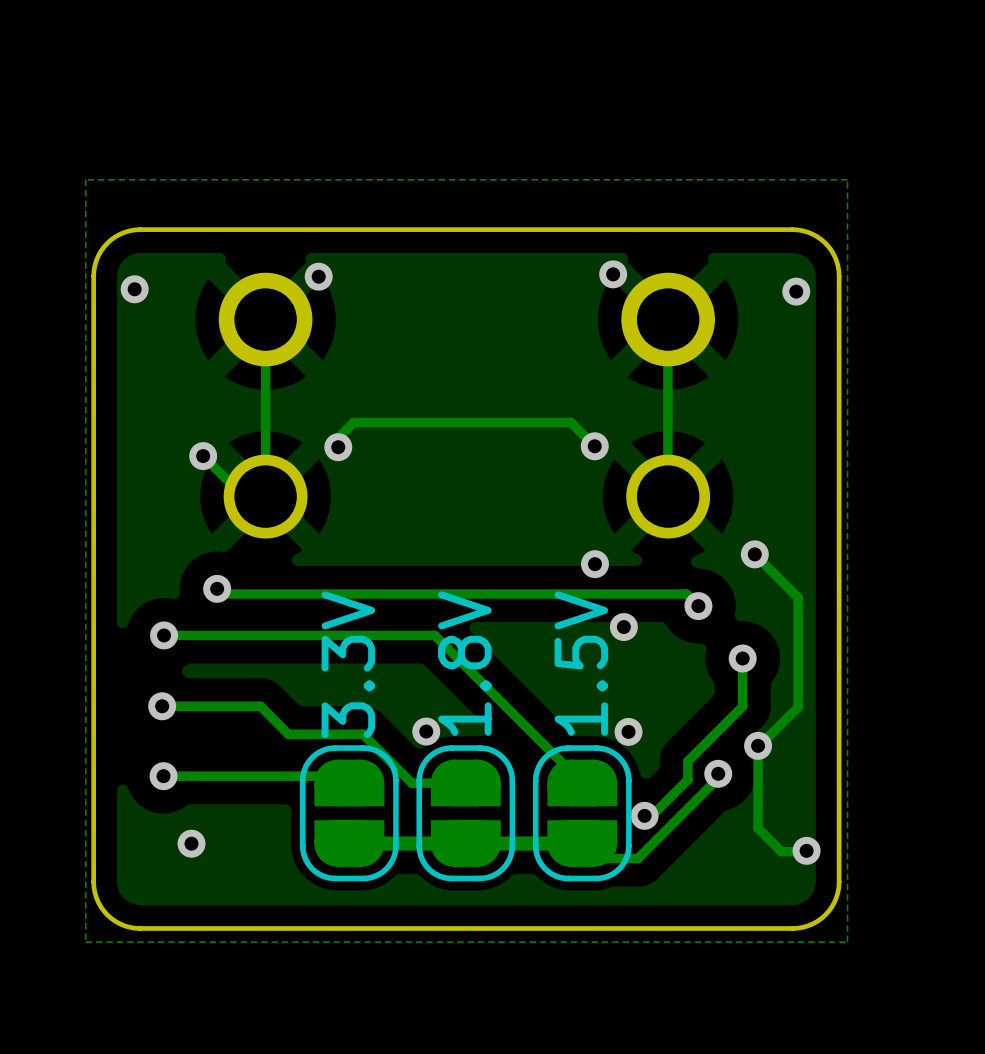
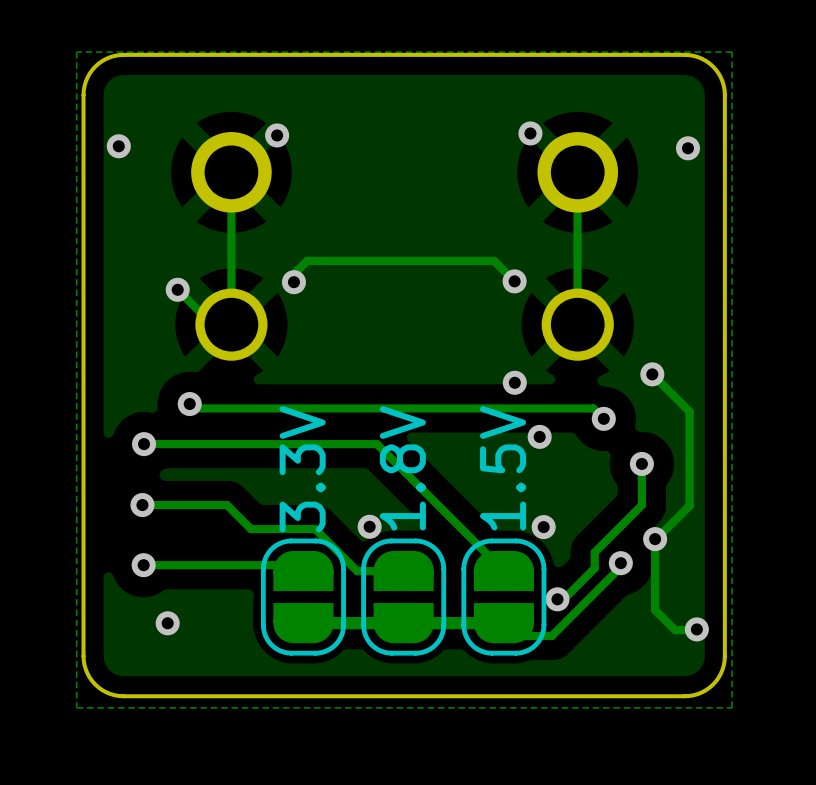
board edge: (839, 276) (836, 260) (825, 243) (812, 234) (792, 229) (135, 229) (115, 236) (103, 247) (96, 260) (93, 276) -> (724, 135) (724, 90) (720, 77) (713, 66) (706, 61) (698, 57) (684, 54) (119, 55) (102, 61) (92, 69) (87, 77) (83, 90) (83, 135)

